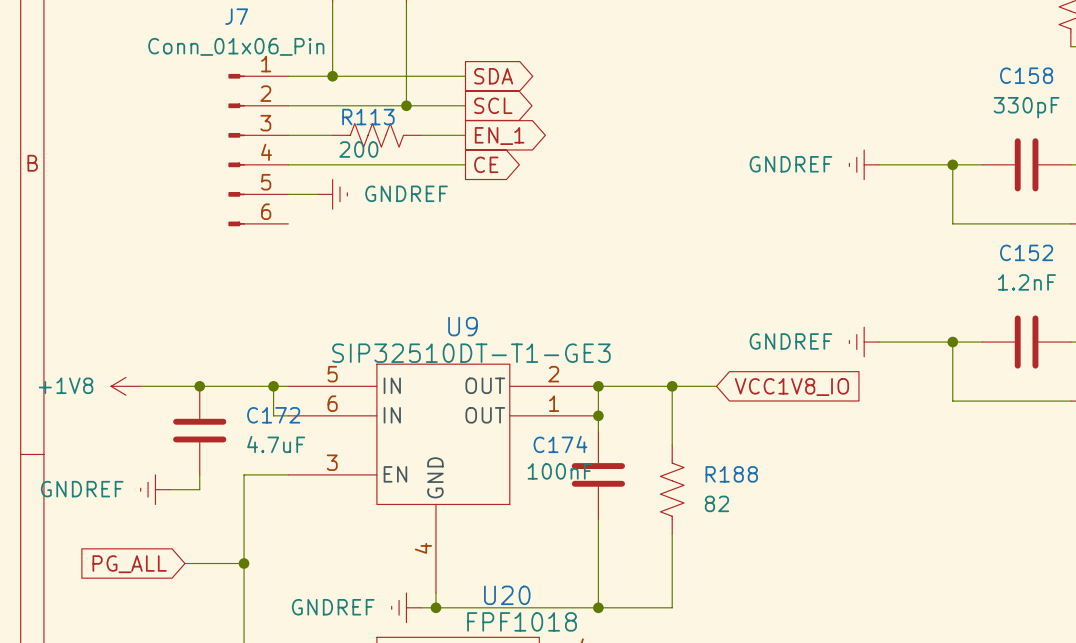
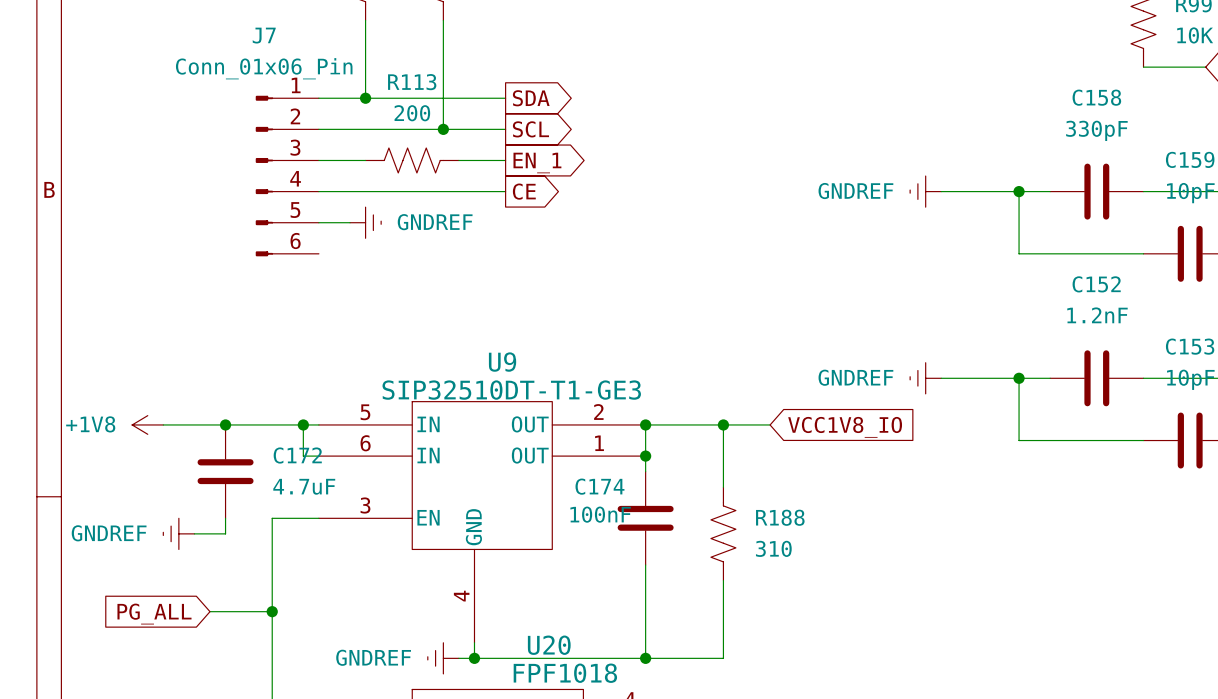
R113 name position: R113 (368, 117) -> R113 (412, 82)
R113 value position: 200 (358, 149) -> 200 (412, 113)
R188 value: 82 (716, 503) -> 310 (773, 548)

